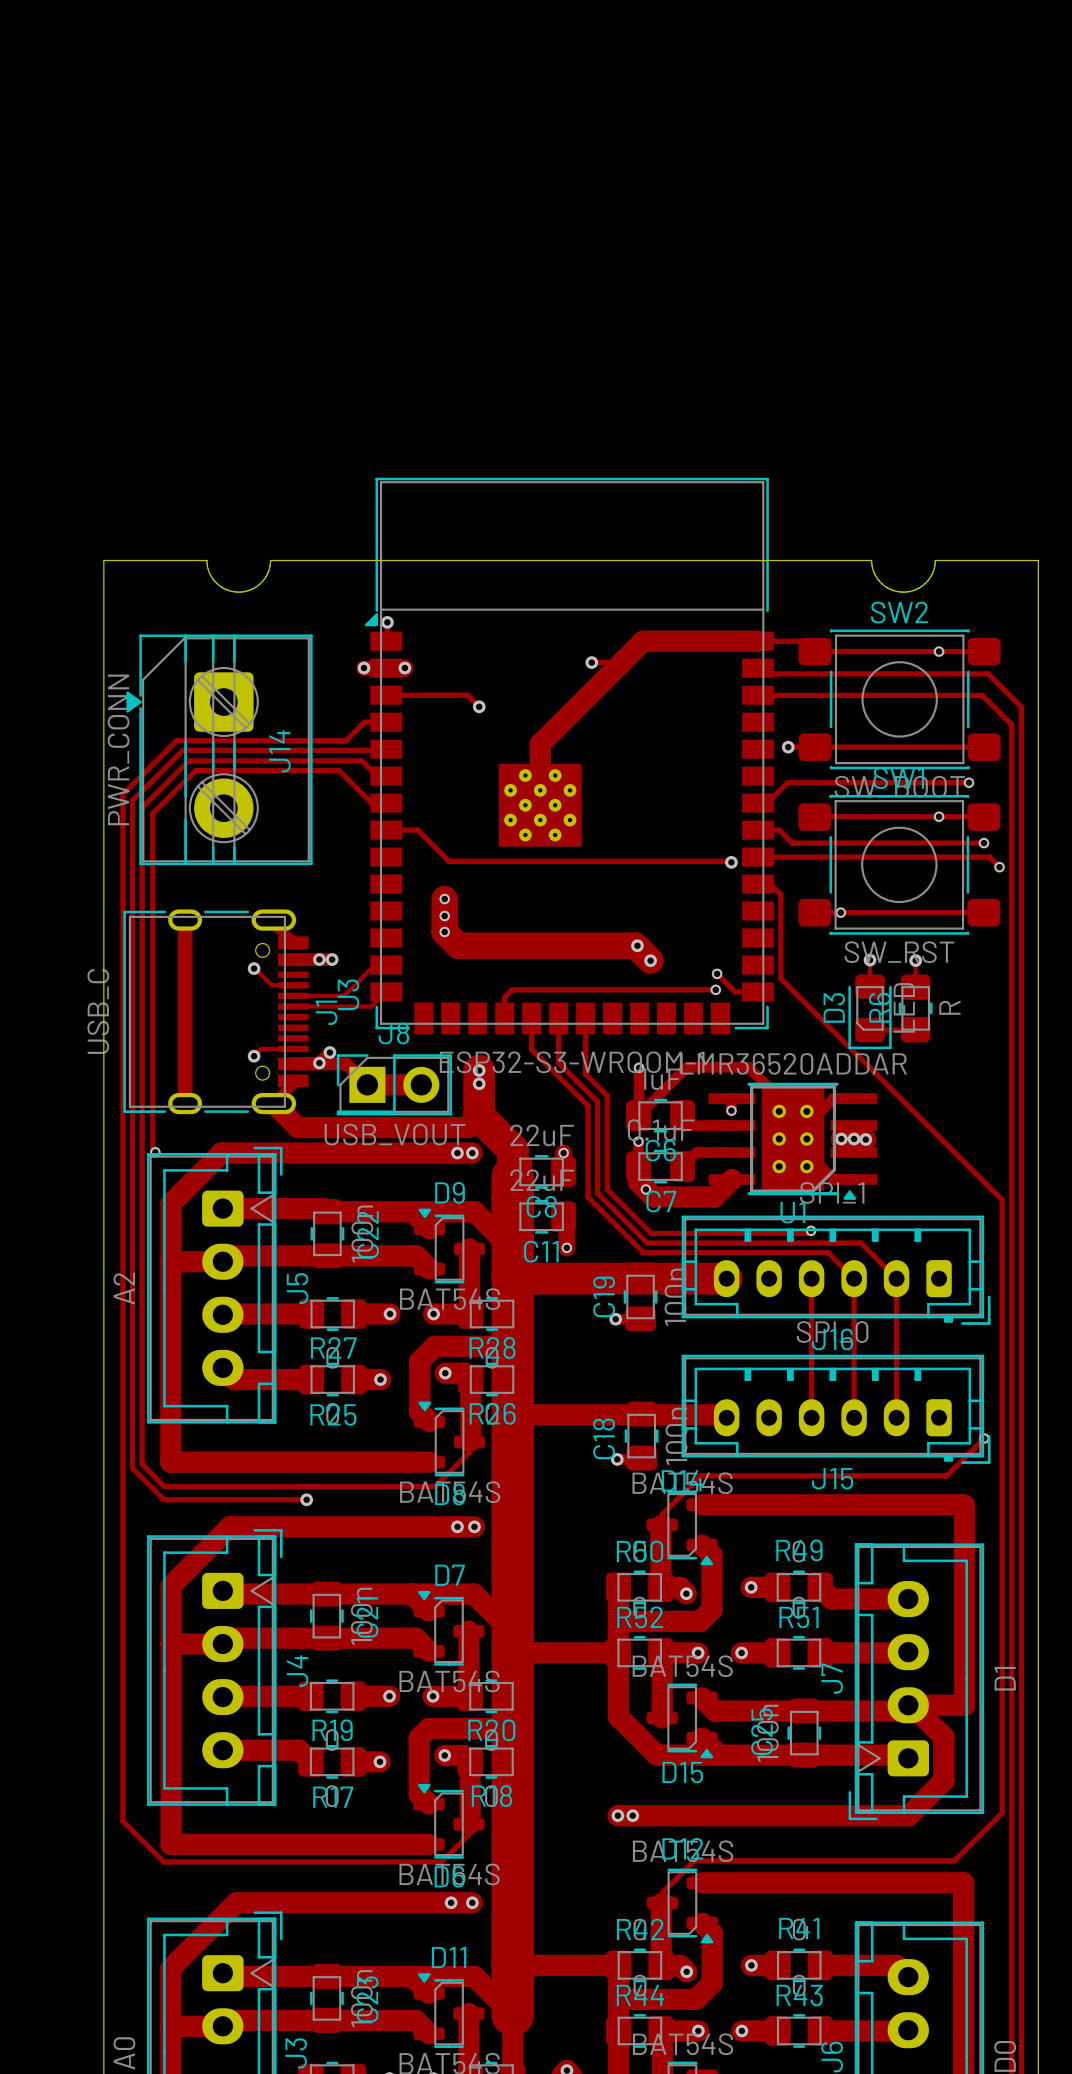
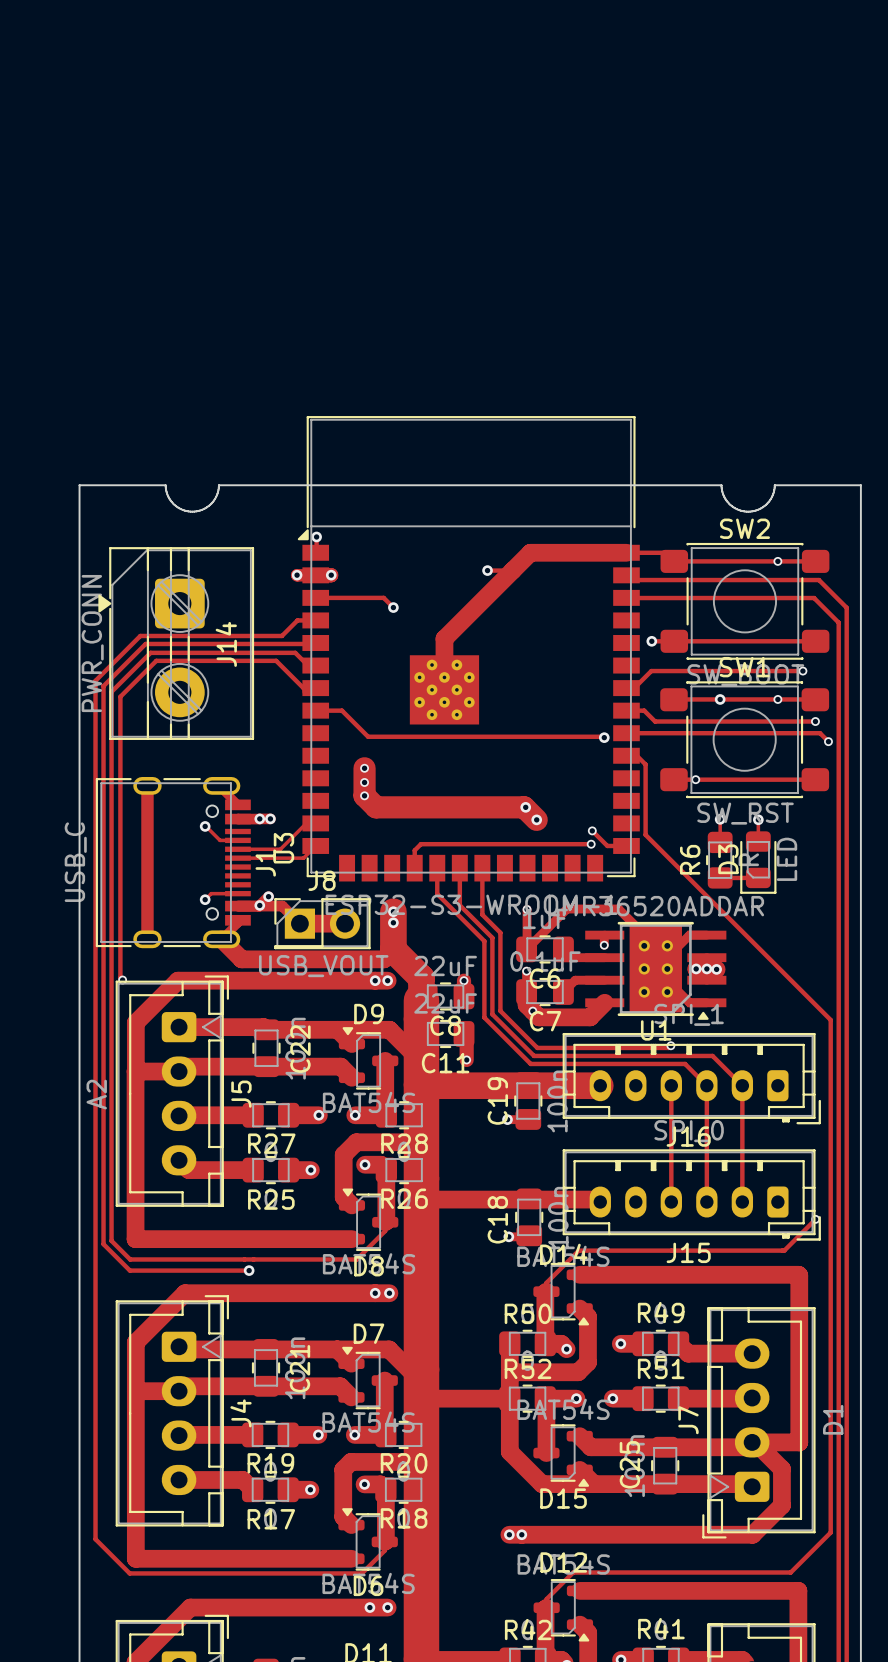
via: none -> (720, 699)
R6 position: (915, 1008) -> (720, 860)
D3 position: (870, 1011) -> (758, 862)

